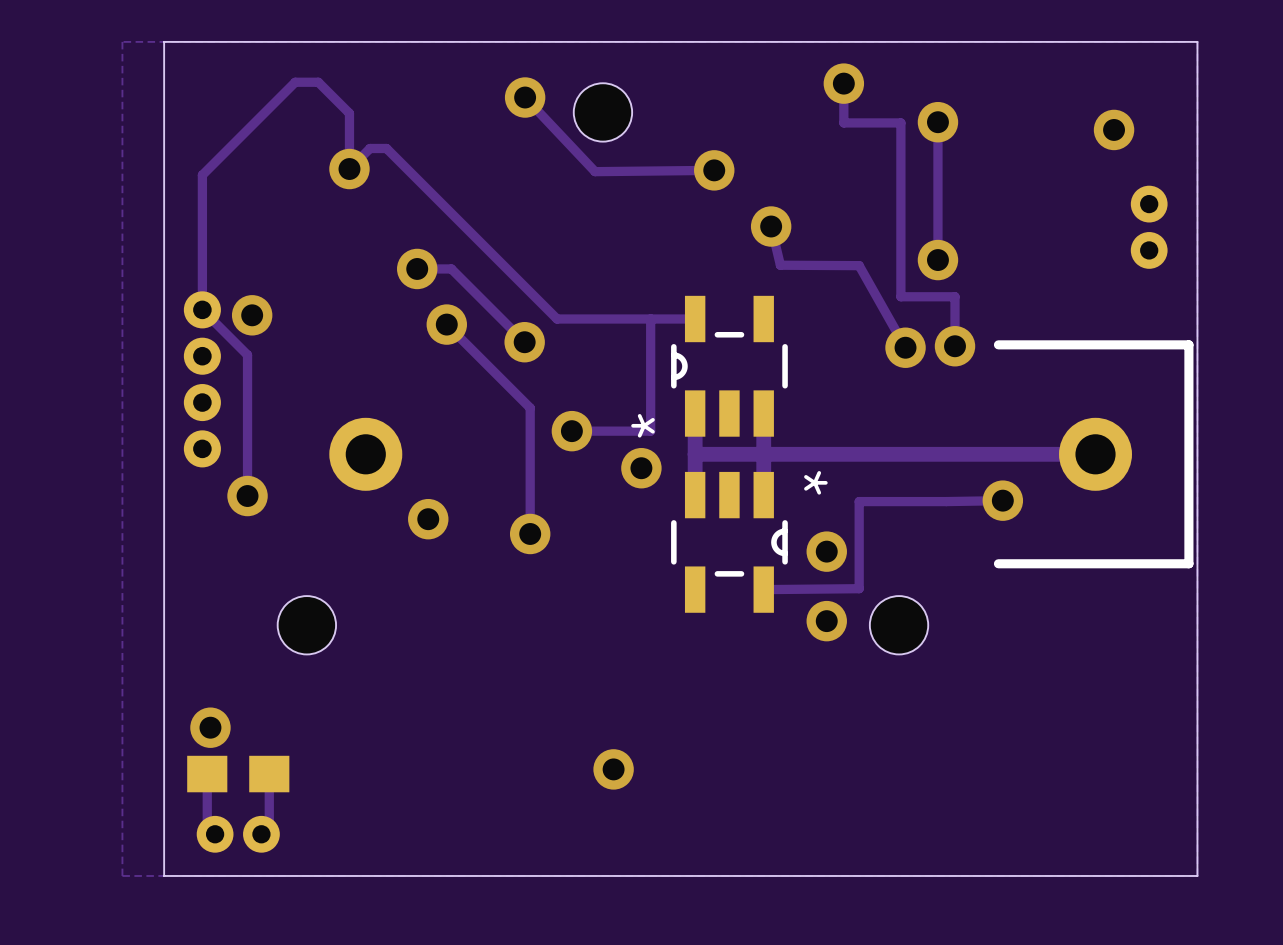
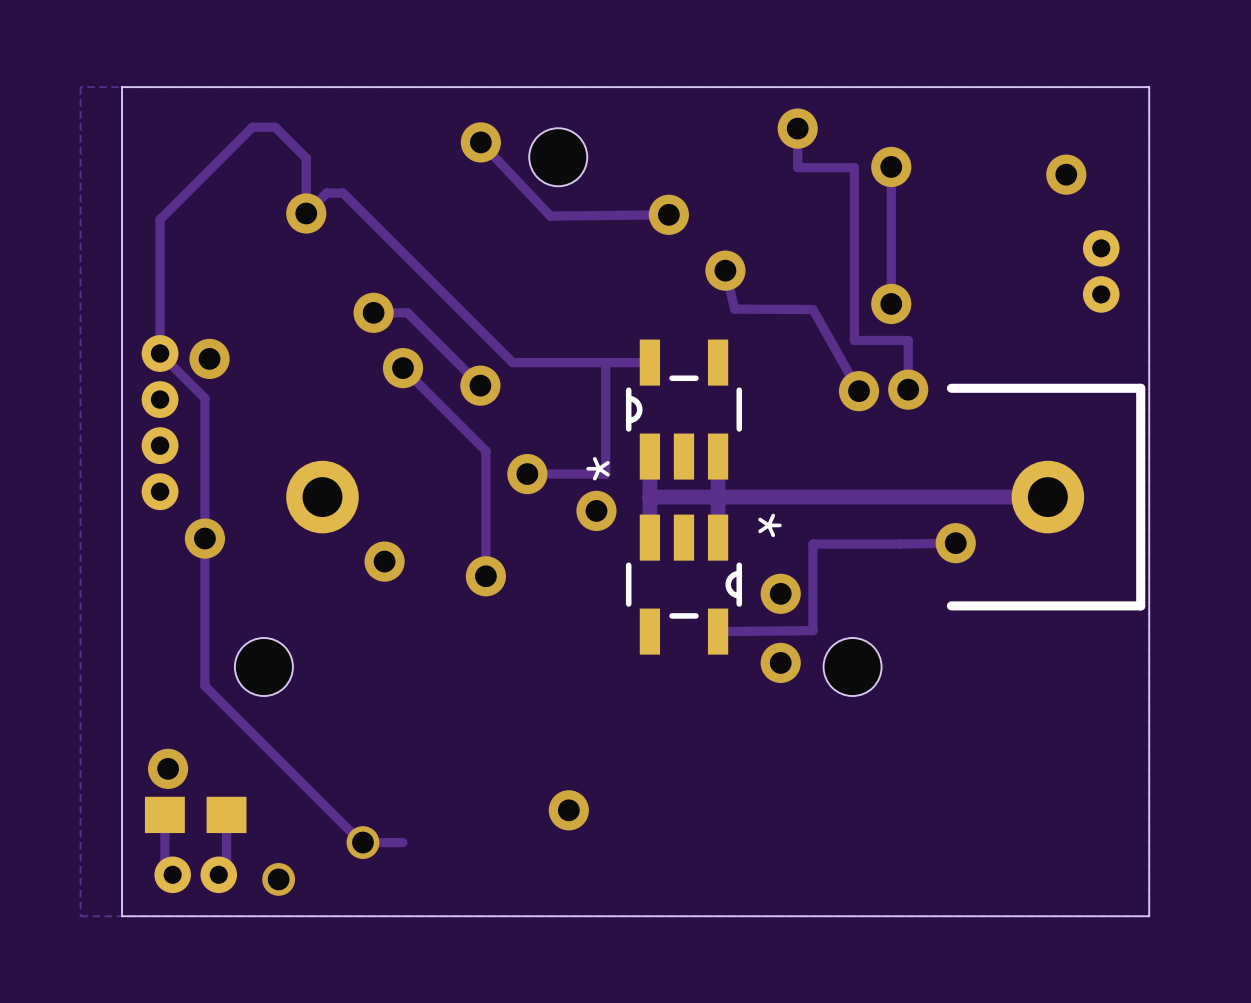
track: none -> (204, 538) (204, 685) (361, 842) (403, 842)
via: none -> (362, 842)
via: none -> (278, 879)

